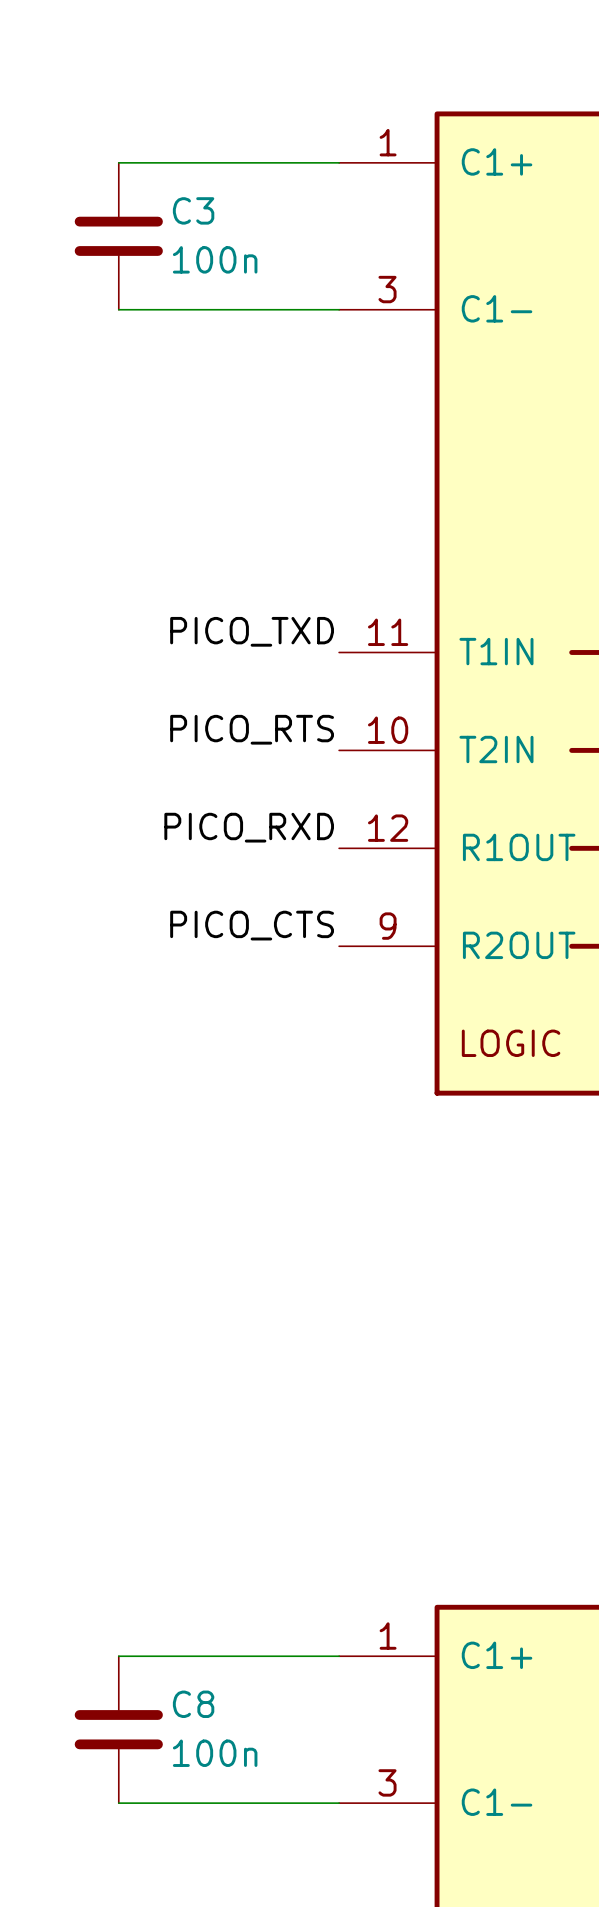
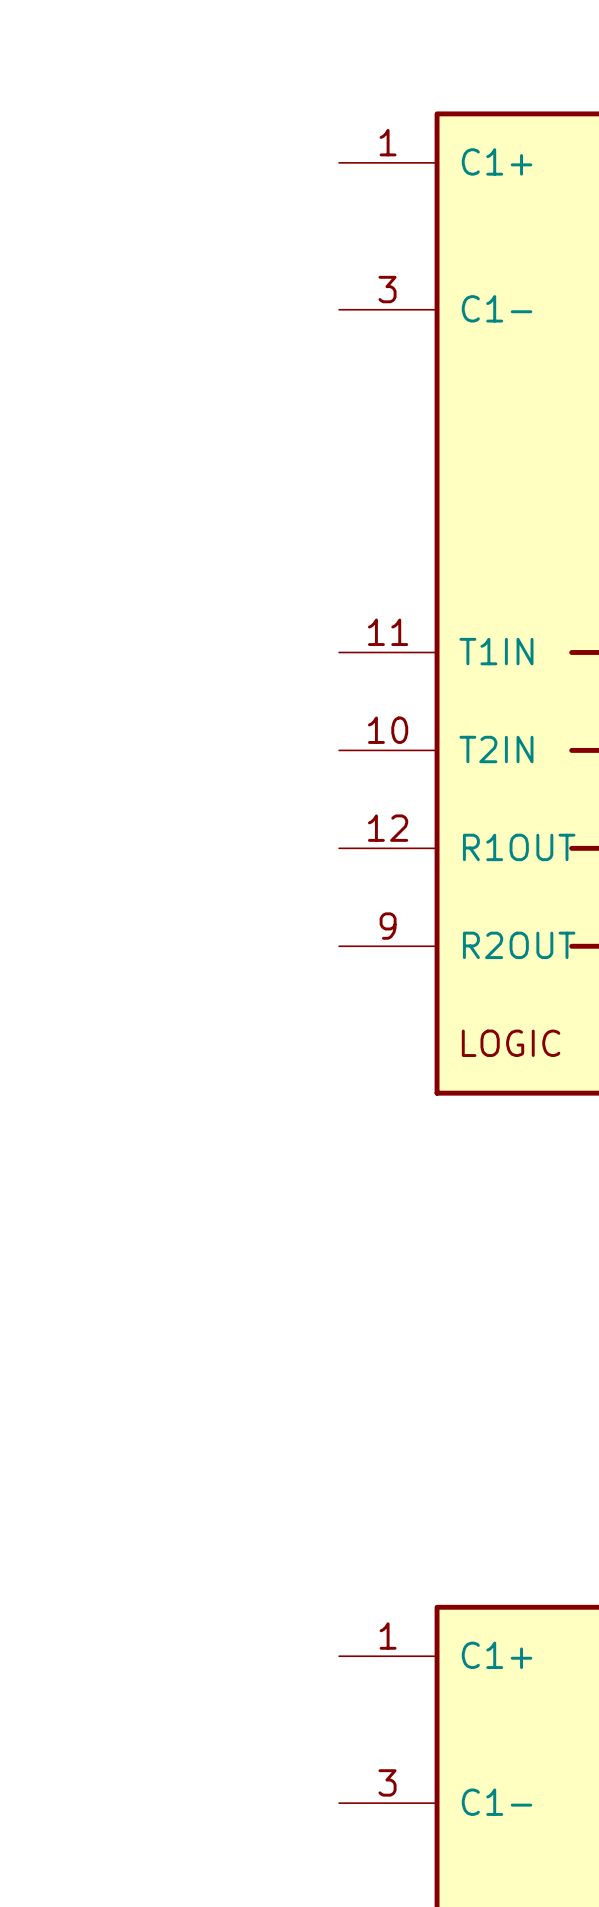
wire: (118, 162) (339, 162) -> none
C3: 100n (118, 236) -> none
wire: (118, 309) (339, 309) -> none
label: PICO_TXD (252, 631) -> none
label: PICO_RTS (252, 729) -> none
label: PICO_RXD (249, 827) -> none
label: PICO_CTS (252, 925) -> none
wire: (118, 1656) (339, 1656) -> none
C8: 100n (118, 1729) -> none
wire: (118, 1803) (339, 1803) -> none

